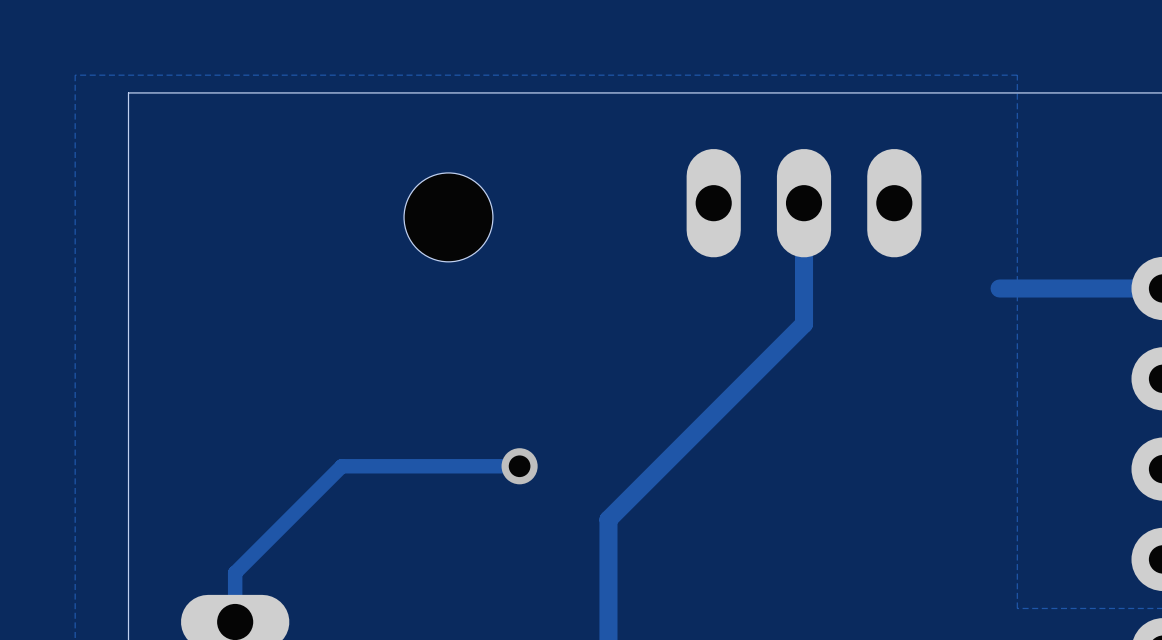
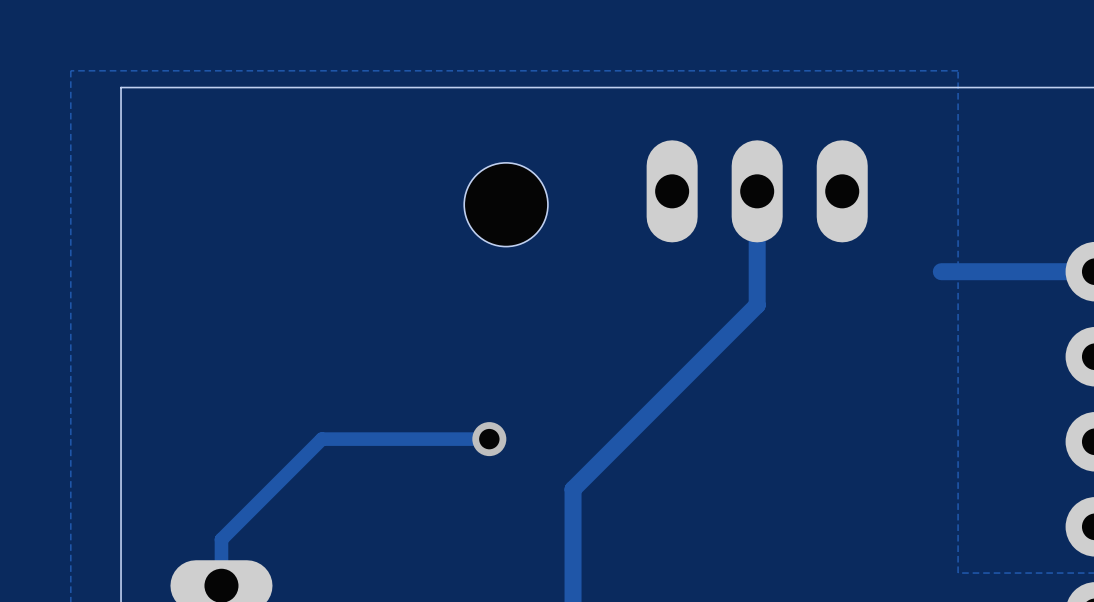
hole position: (448, 217) -> (506, 204)

